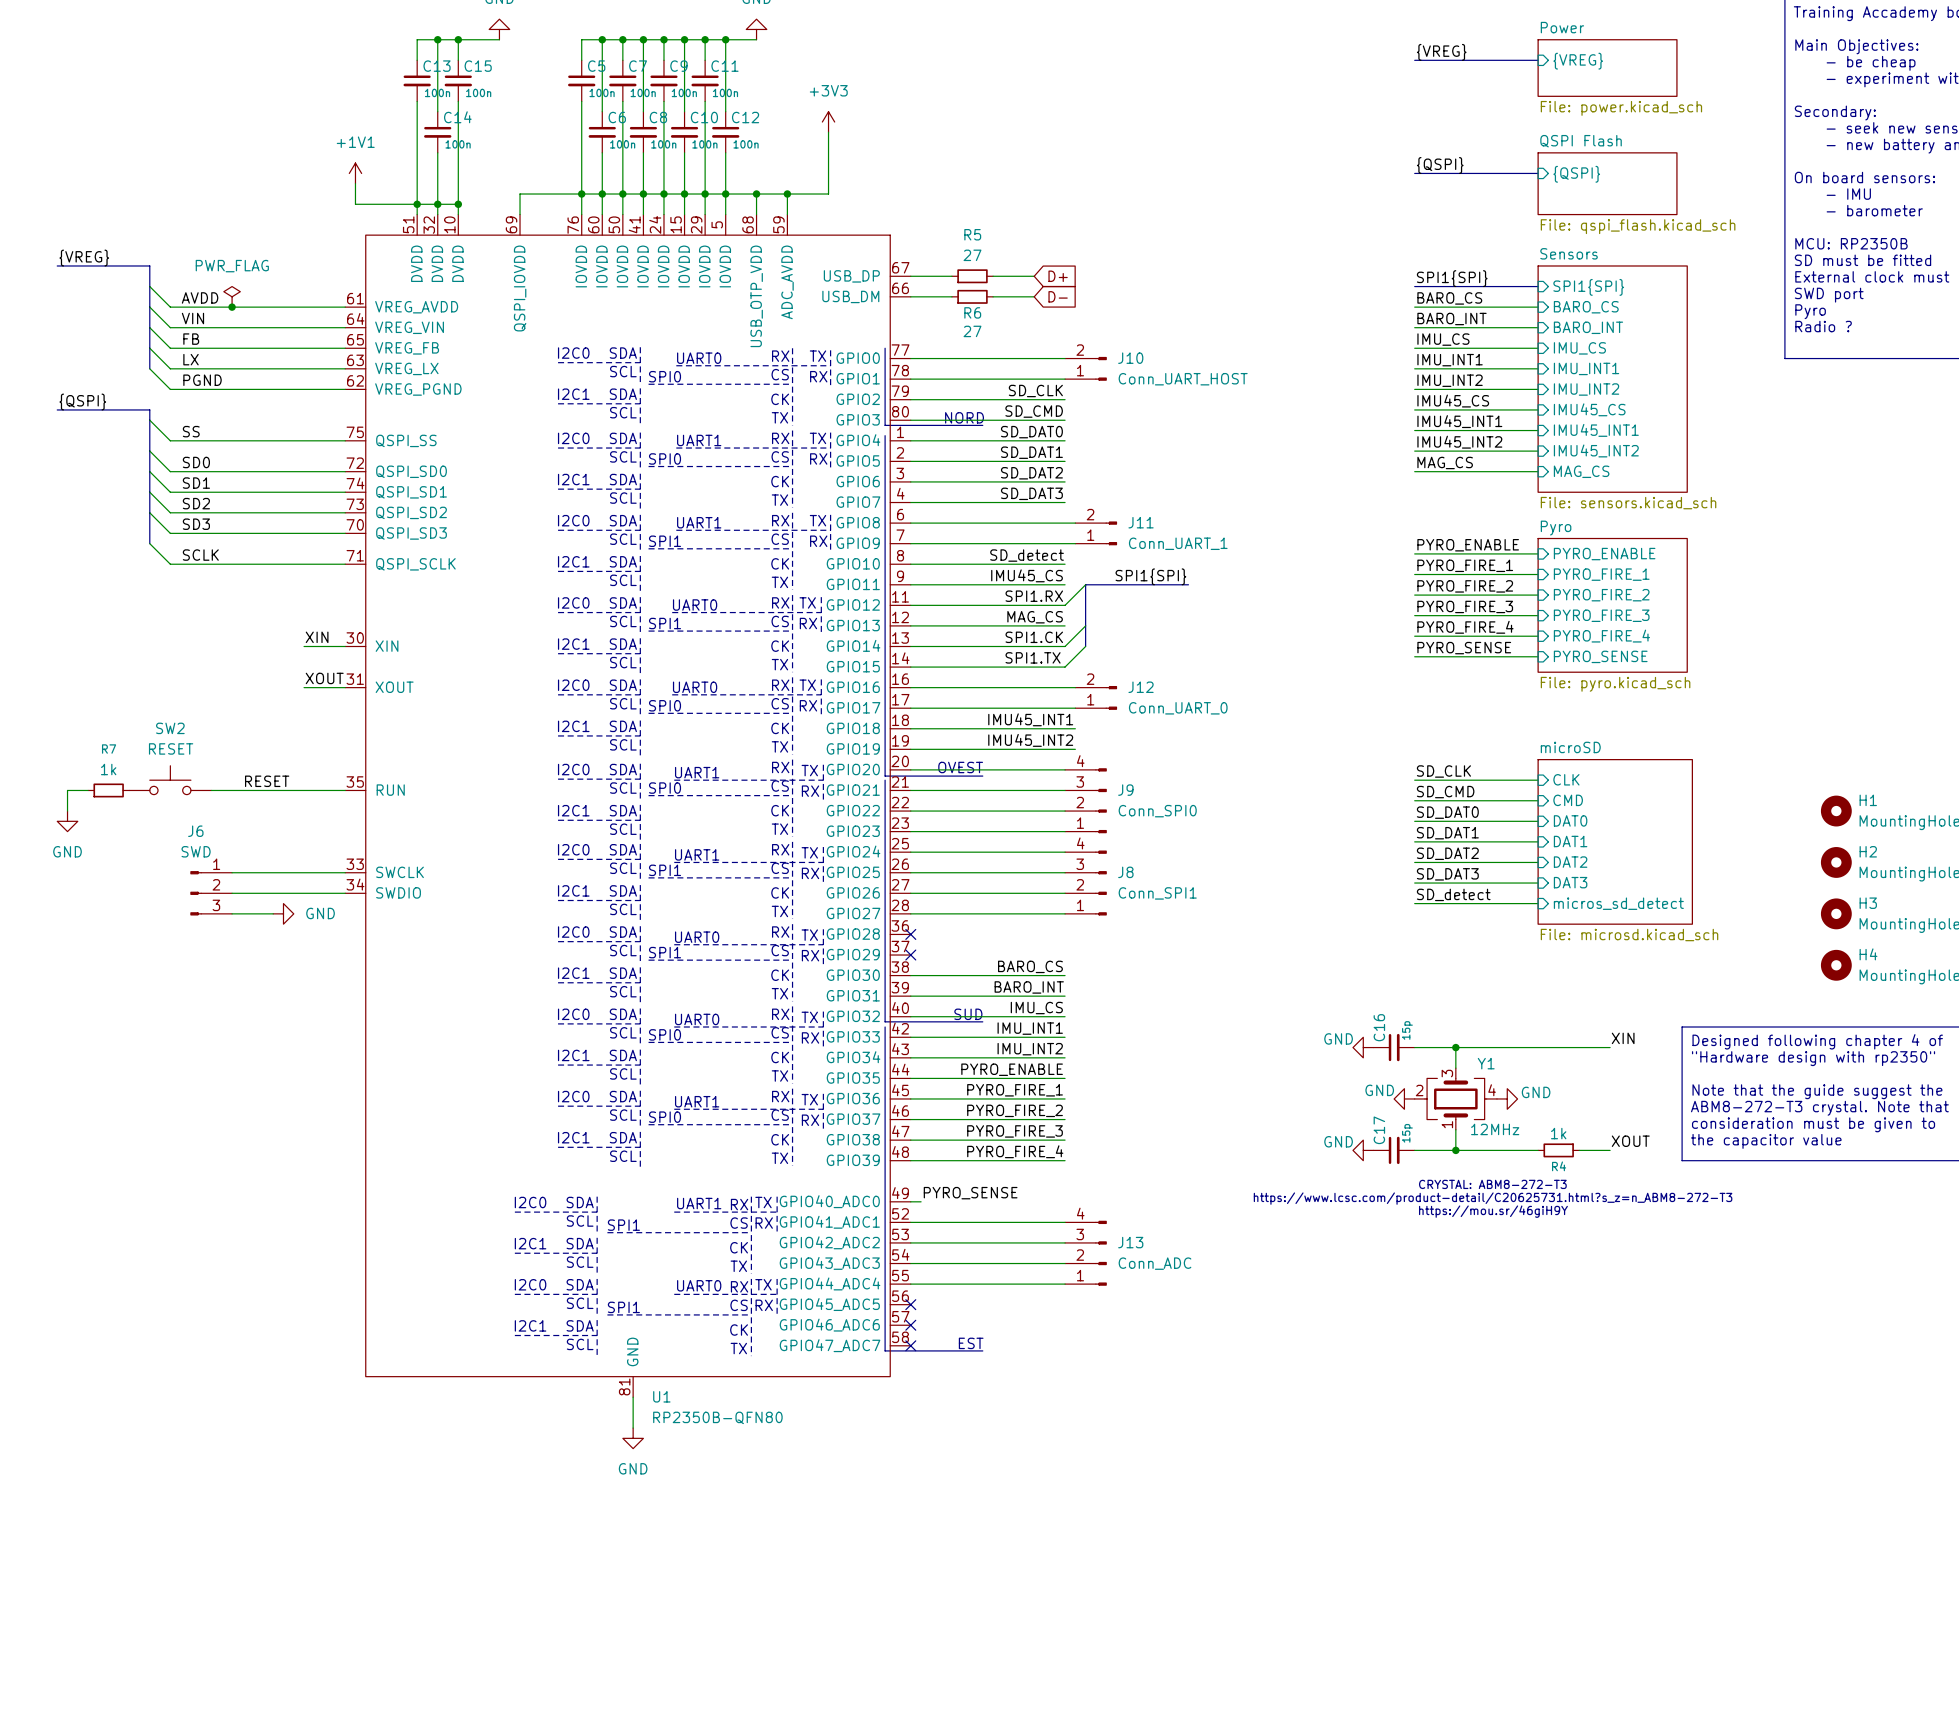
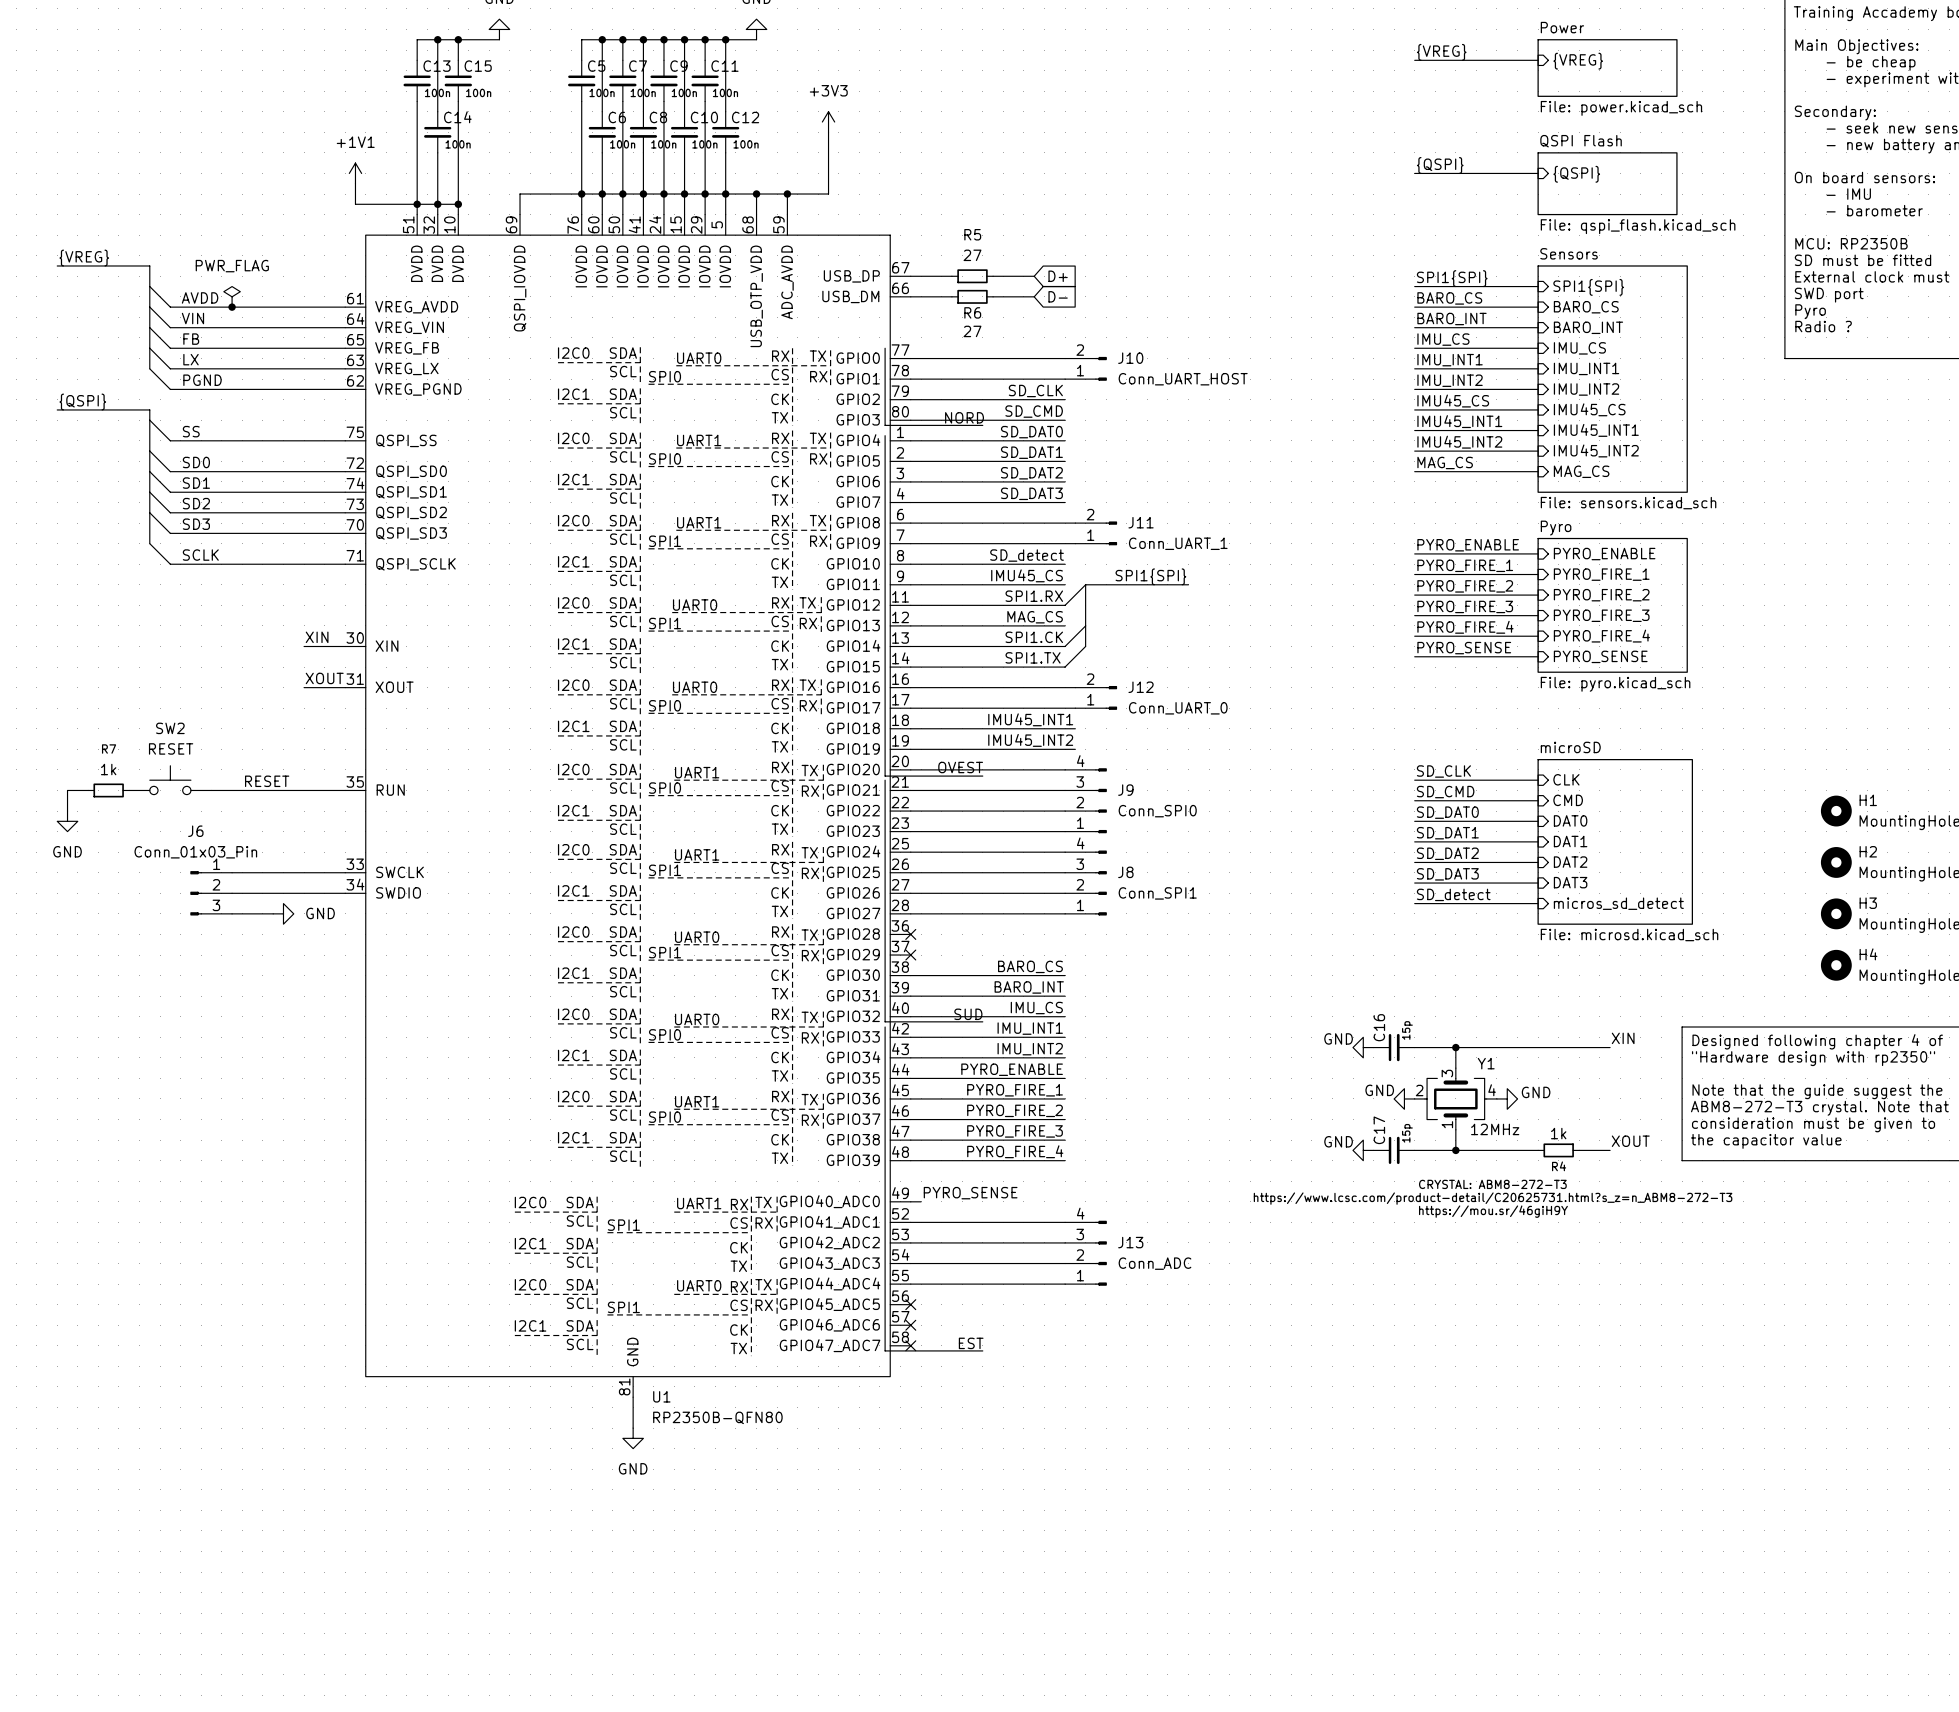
J6 value: SWD (196, 851) -> Conn_01x03_Pin (195, 852)

